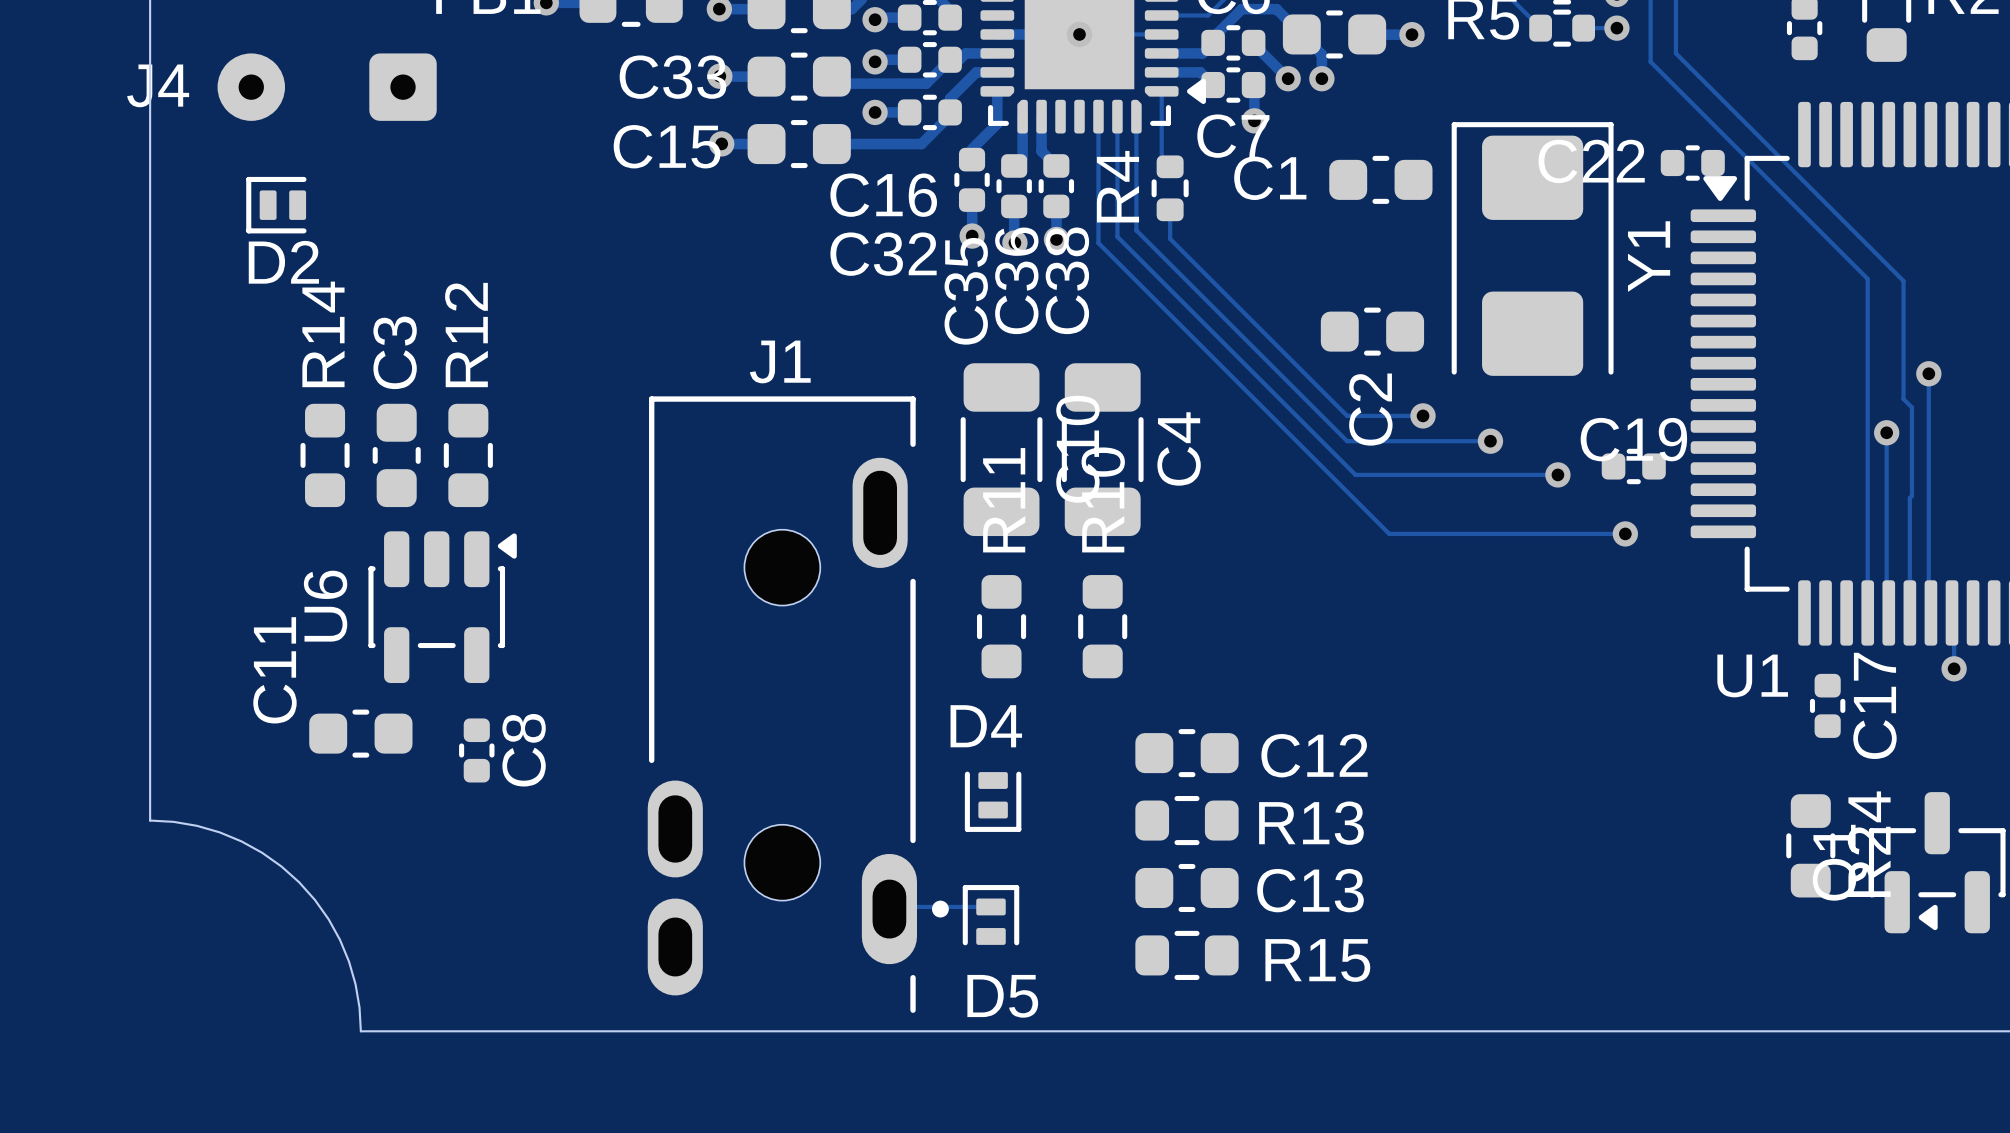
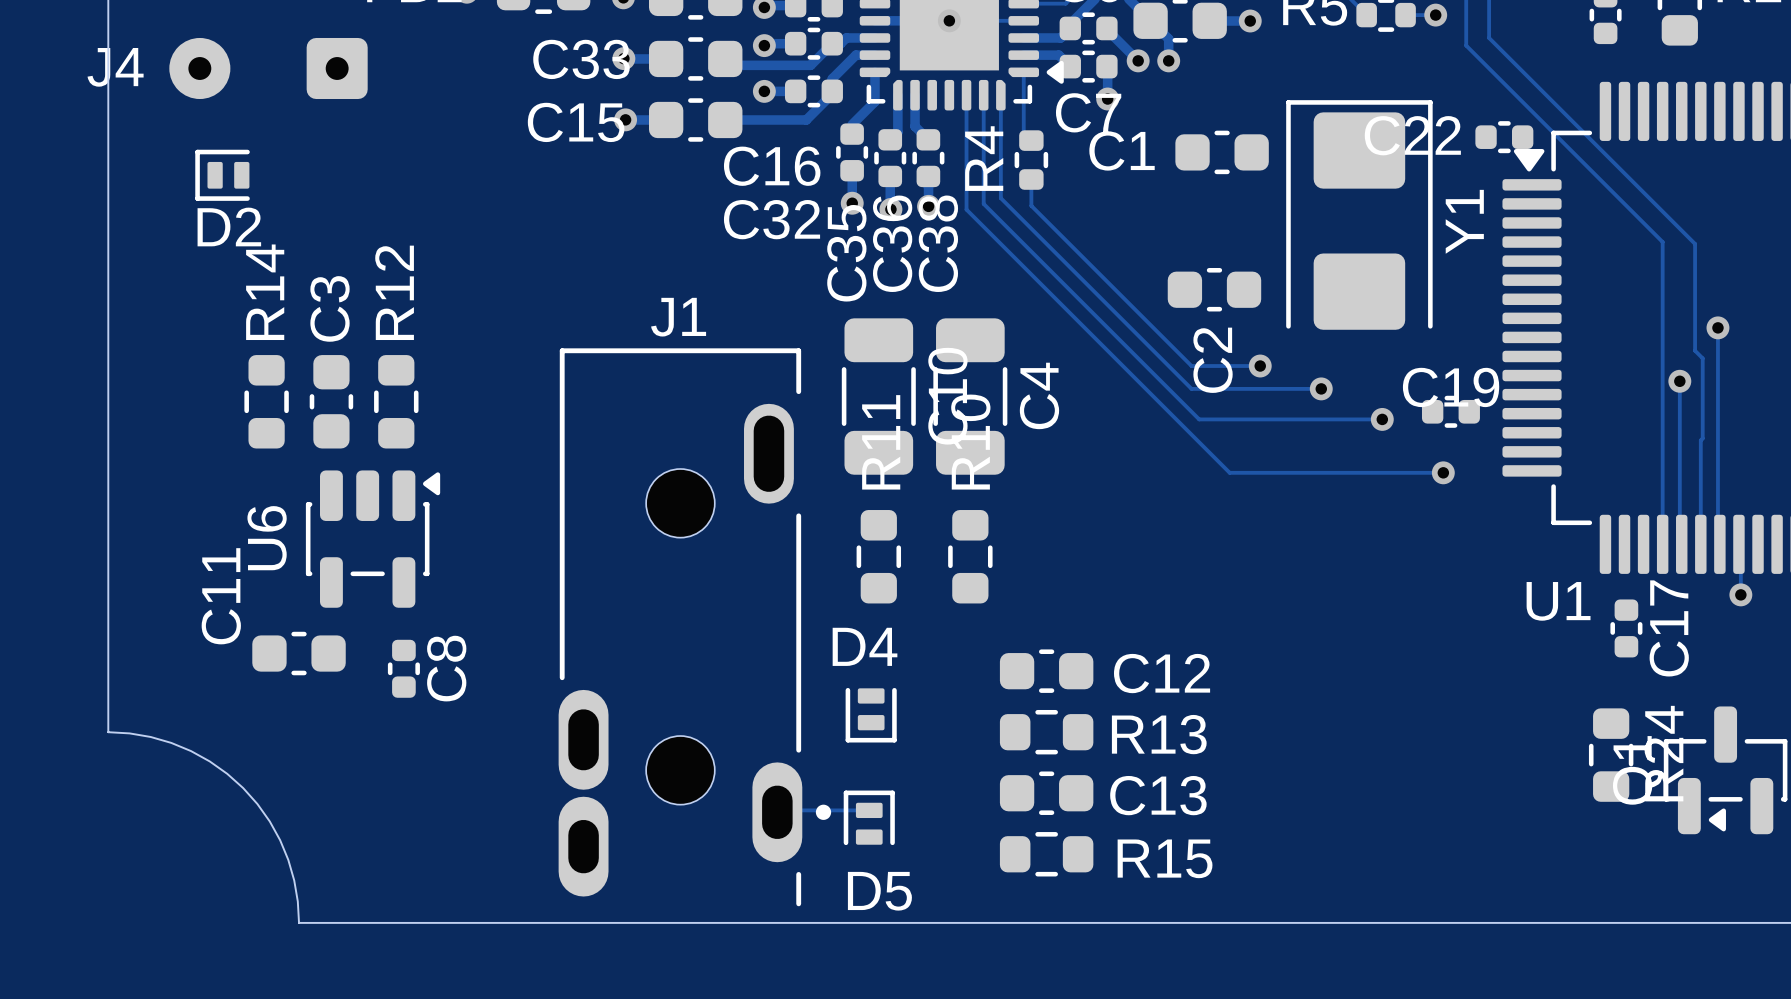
J1 footprint: [647, 396, 949, 1013] -> [558, 348, 832, 907]

